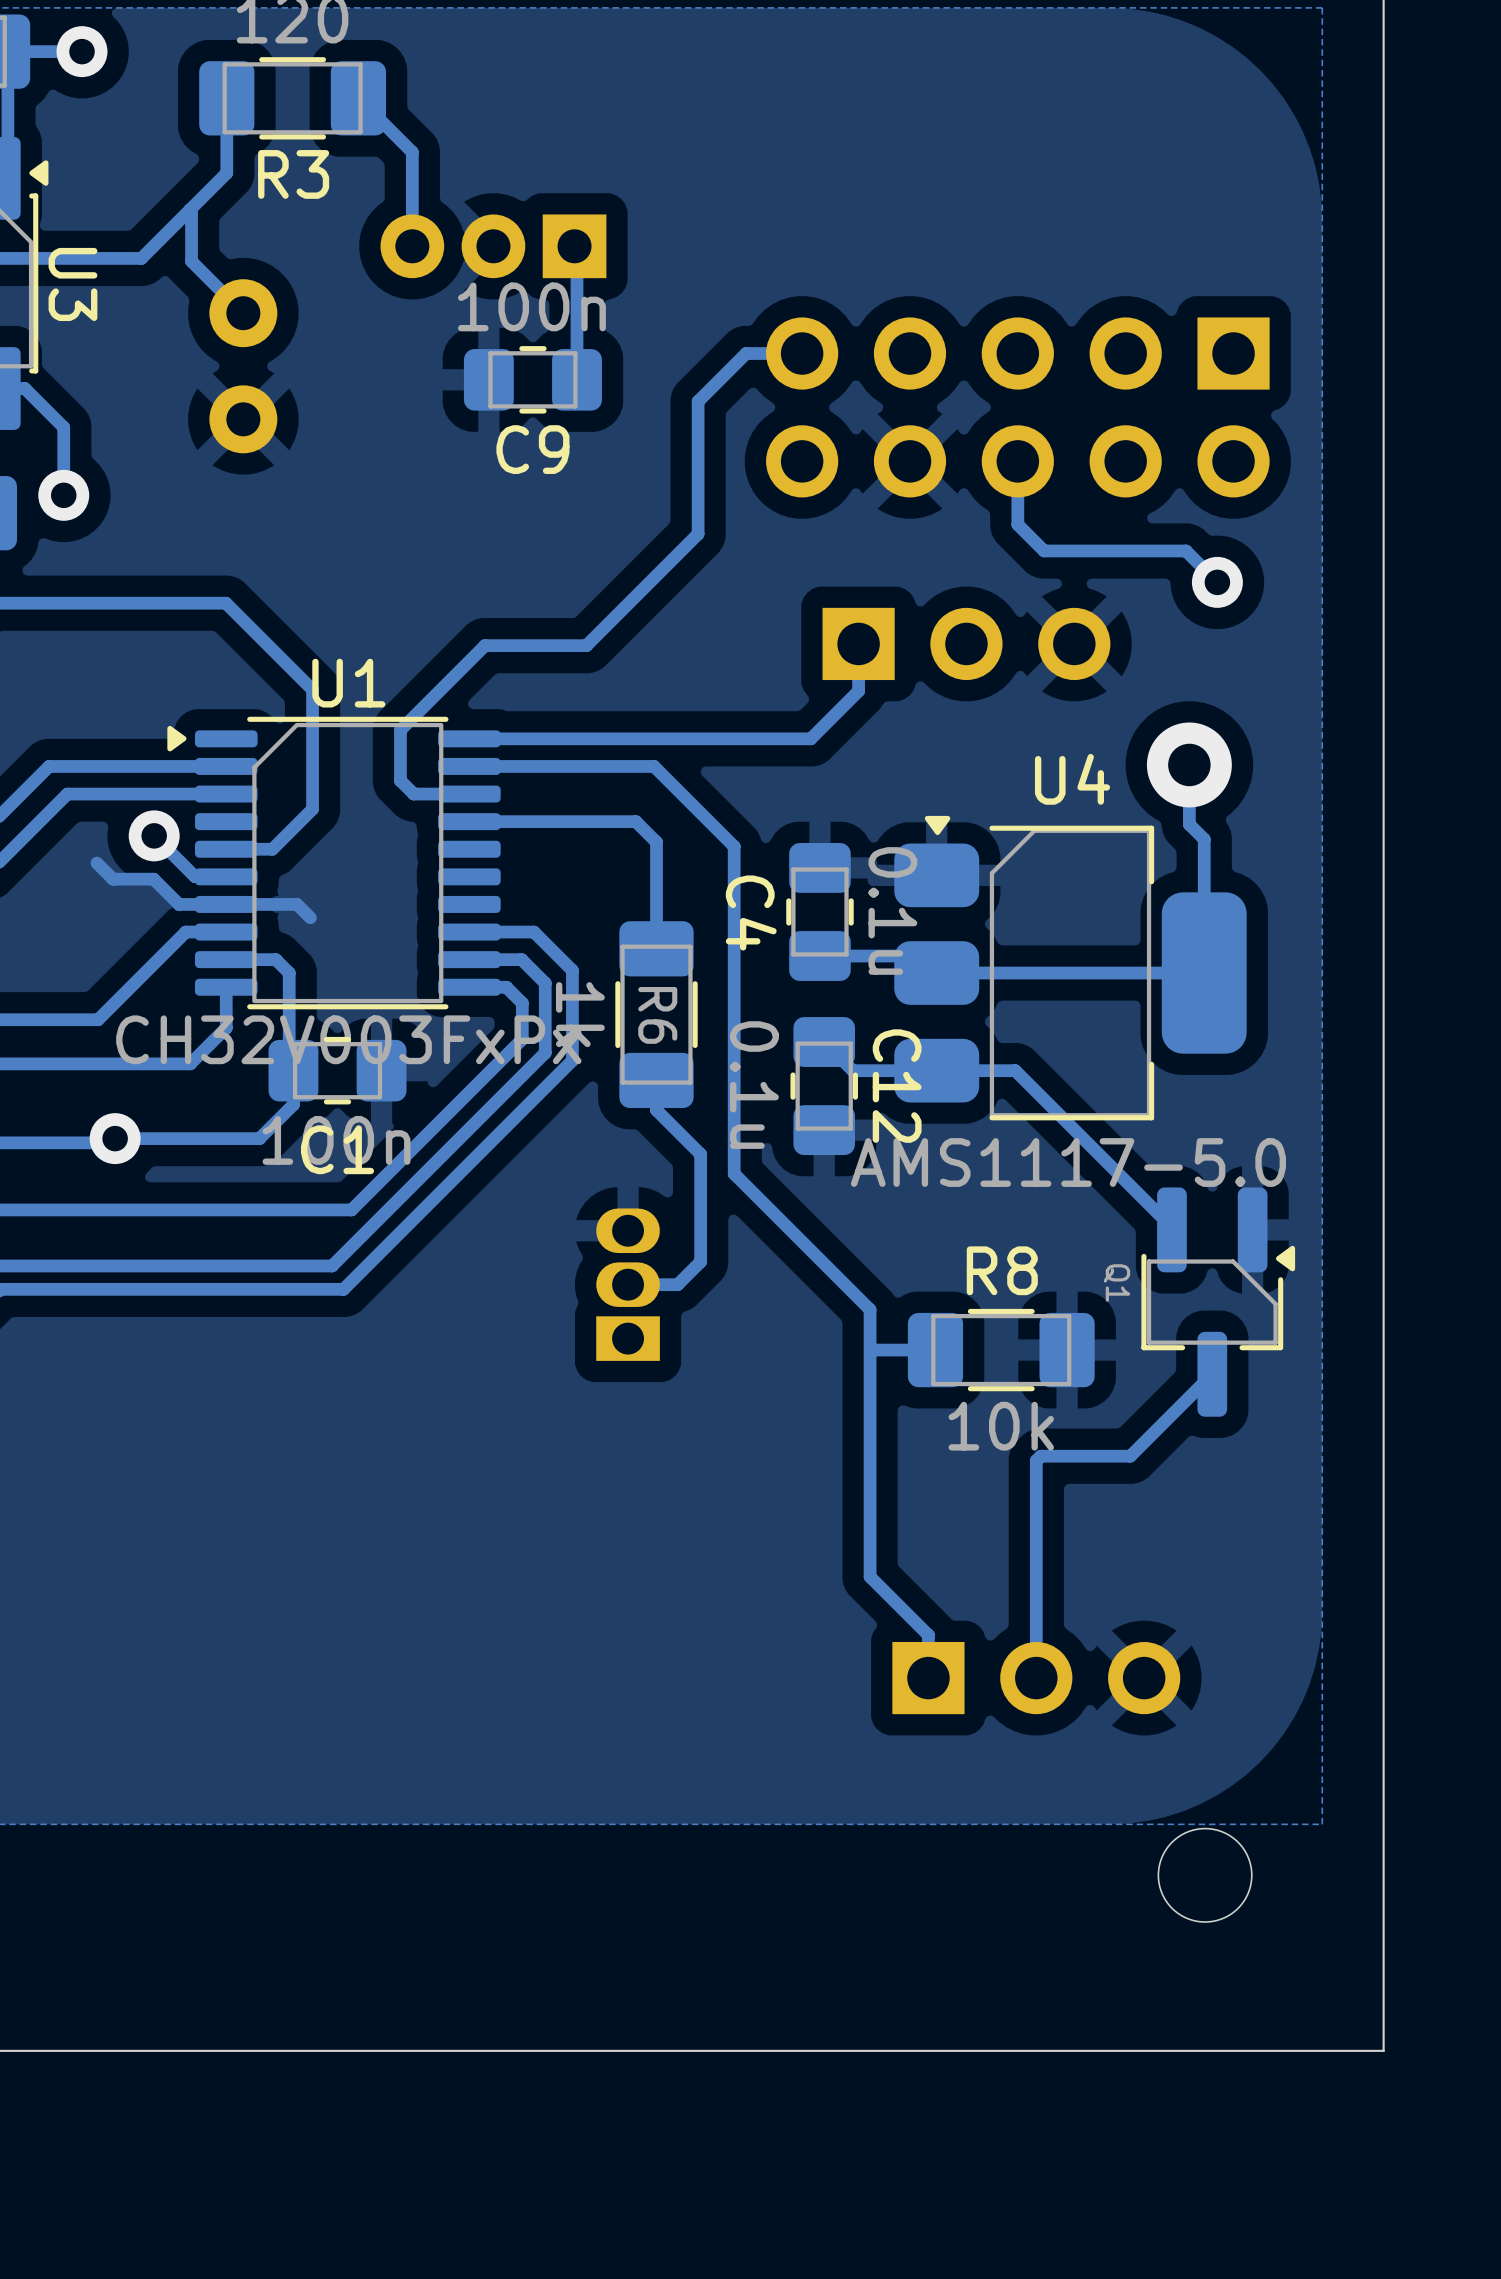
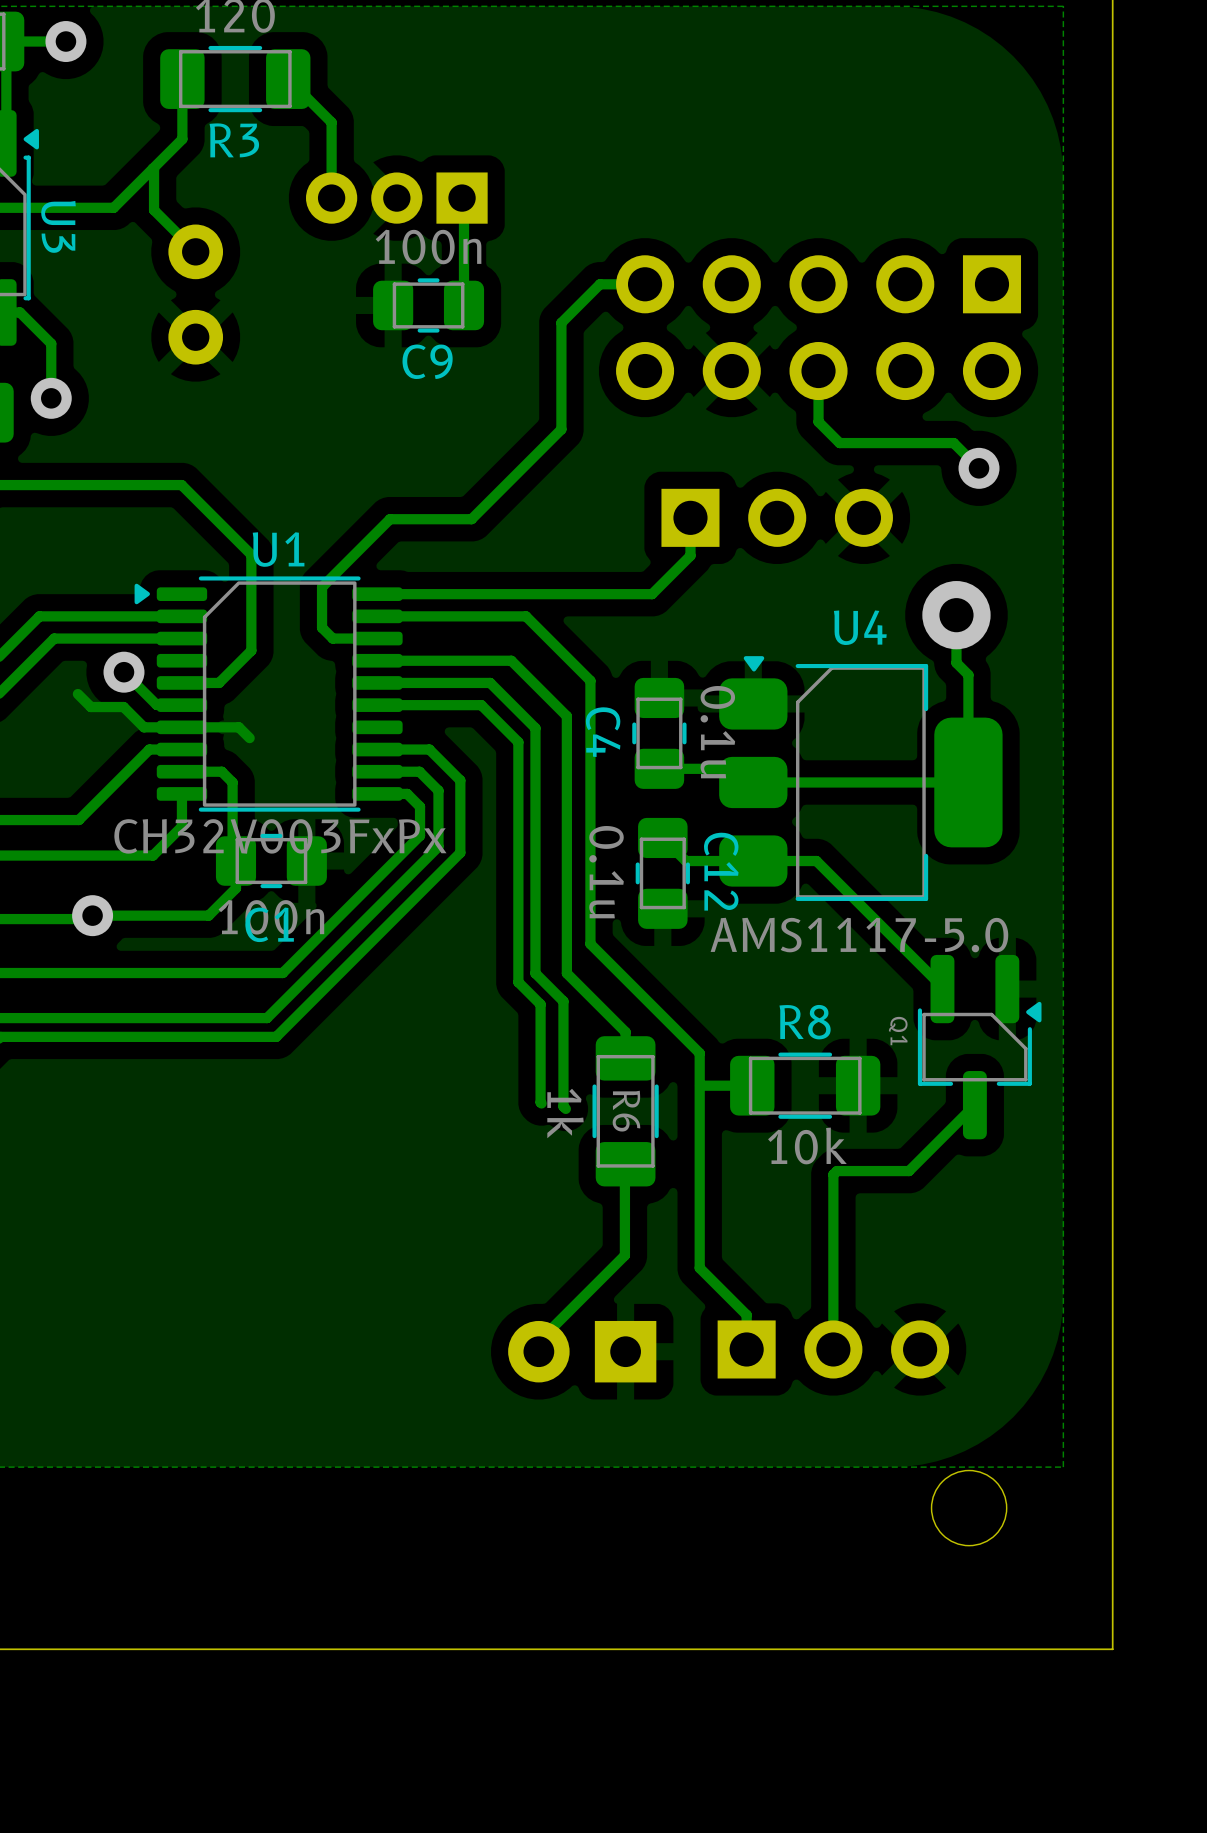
track: (656, 842) (656, 948) -> (527, 677) (566, 716) (566, 973) (625, 1032) (625, 1058)
track: none -> (377, 705) (481, 705) (518, 742) (518, 982) (540, 1004) (541, 1103)
R6 position: (656, 1014) -> (625, 1111)
track: (656, 1080) (656, 1110) (700, 1154) (700, 1245) -> (377, 682) (490, 682) (535, 728) (535, 973) (563, 1001)
track: (700, 1261) (677, 1284) (628, 1284) -> (563, 1014) (563, 1106) (565, 1108)
part: (628, 1284) -> none
track: none -> (625, 1164) (624, 1255) (538, 1341) (538, 1351)
part: none -> (582, 1351)

